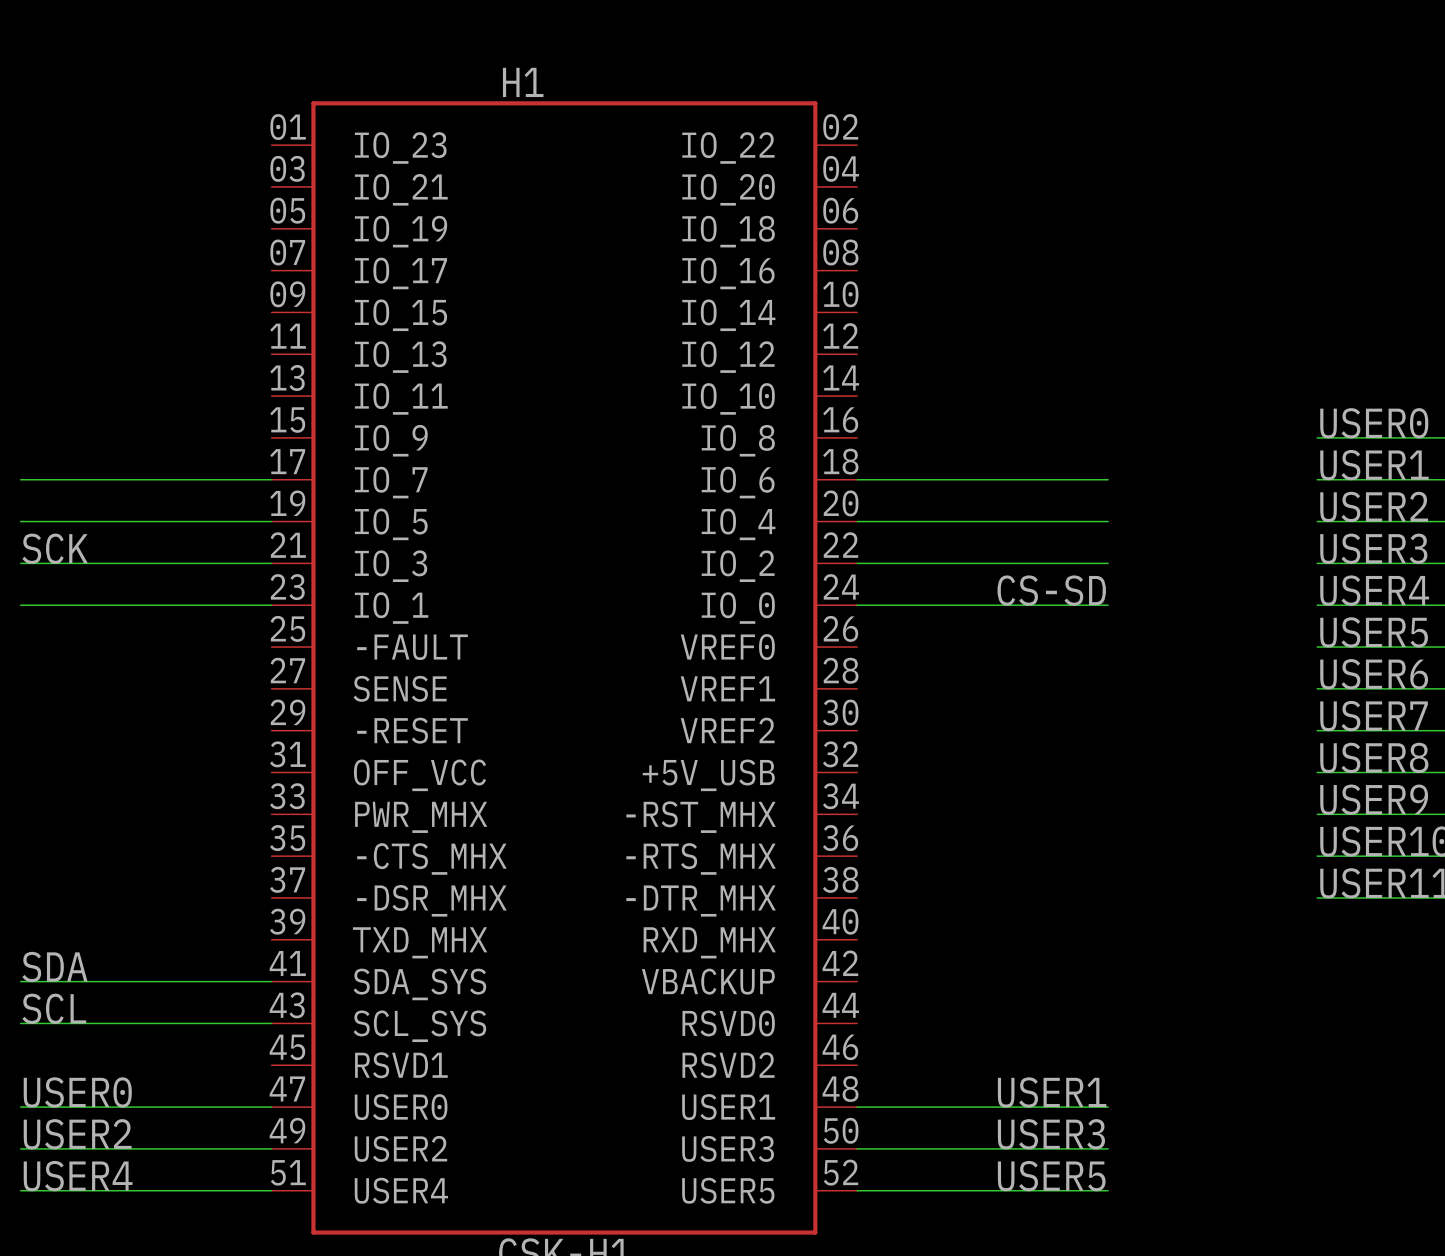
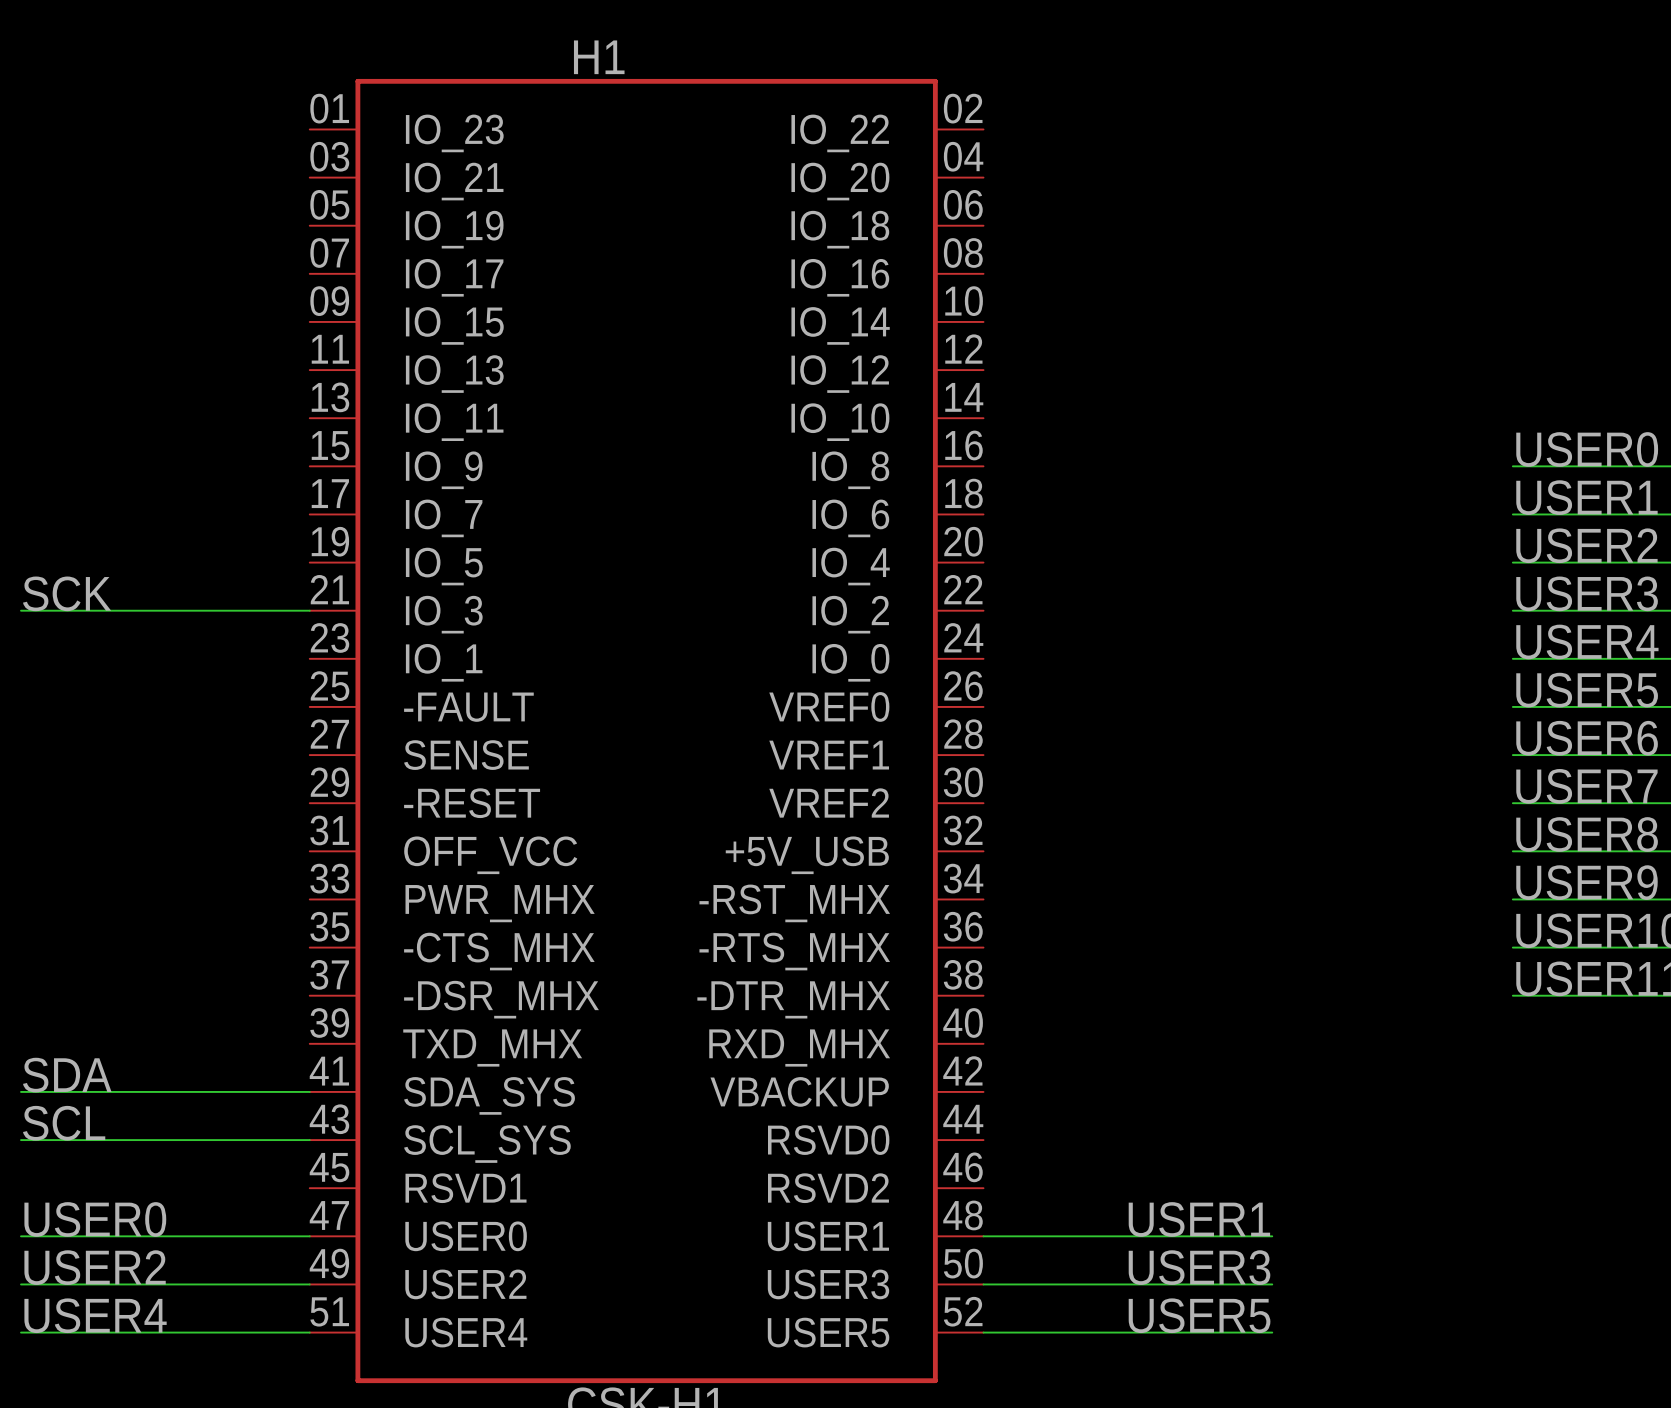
wire: (20, 479) (271, 479) -> none
wire: (857, 479) (1108, 479) -> none
wire: (20, 521) (271, 521) -> none
wire: (857, 521) (1108, 521) -> none
wire: (857, 563) (1108, 563) -> none
label: CS-SD (1051, 590) -> none
wire: (20, 605) (271, 605) -> none
wire: (857, 605) (1108, 605) -> none

